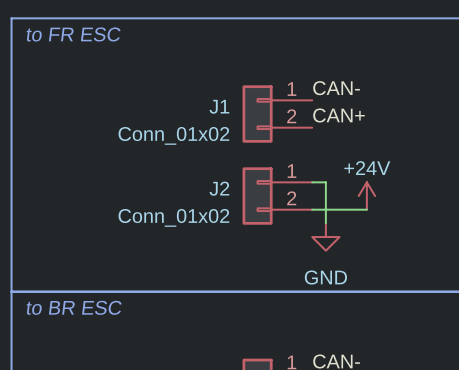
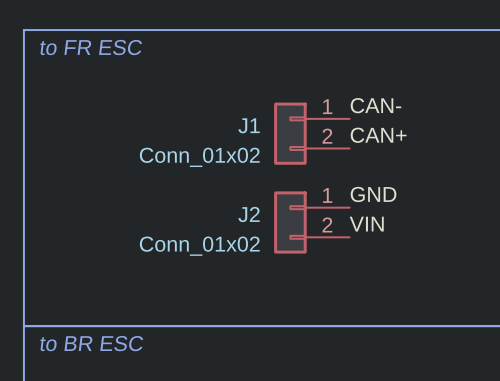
label: none -> GND (373, 194)
wire: (312, 182) (325, 182) (325, 223) -> none
power symbol: +24V (366, 196) -> none
label: none -> VIN (366, 224)
wire: (312, 209) (366, 209) -> none
power symbol: GND (325, 237) -> none

